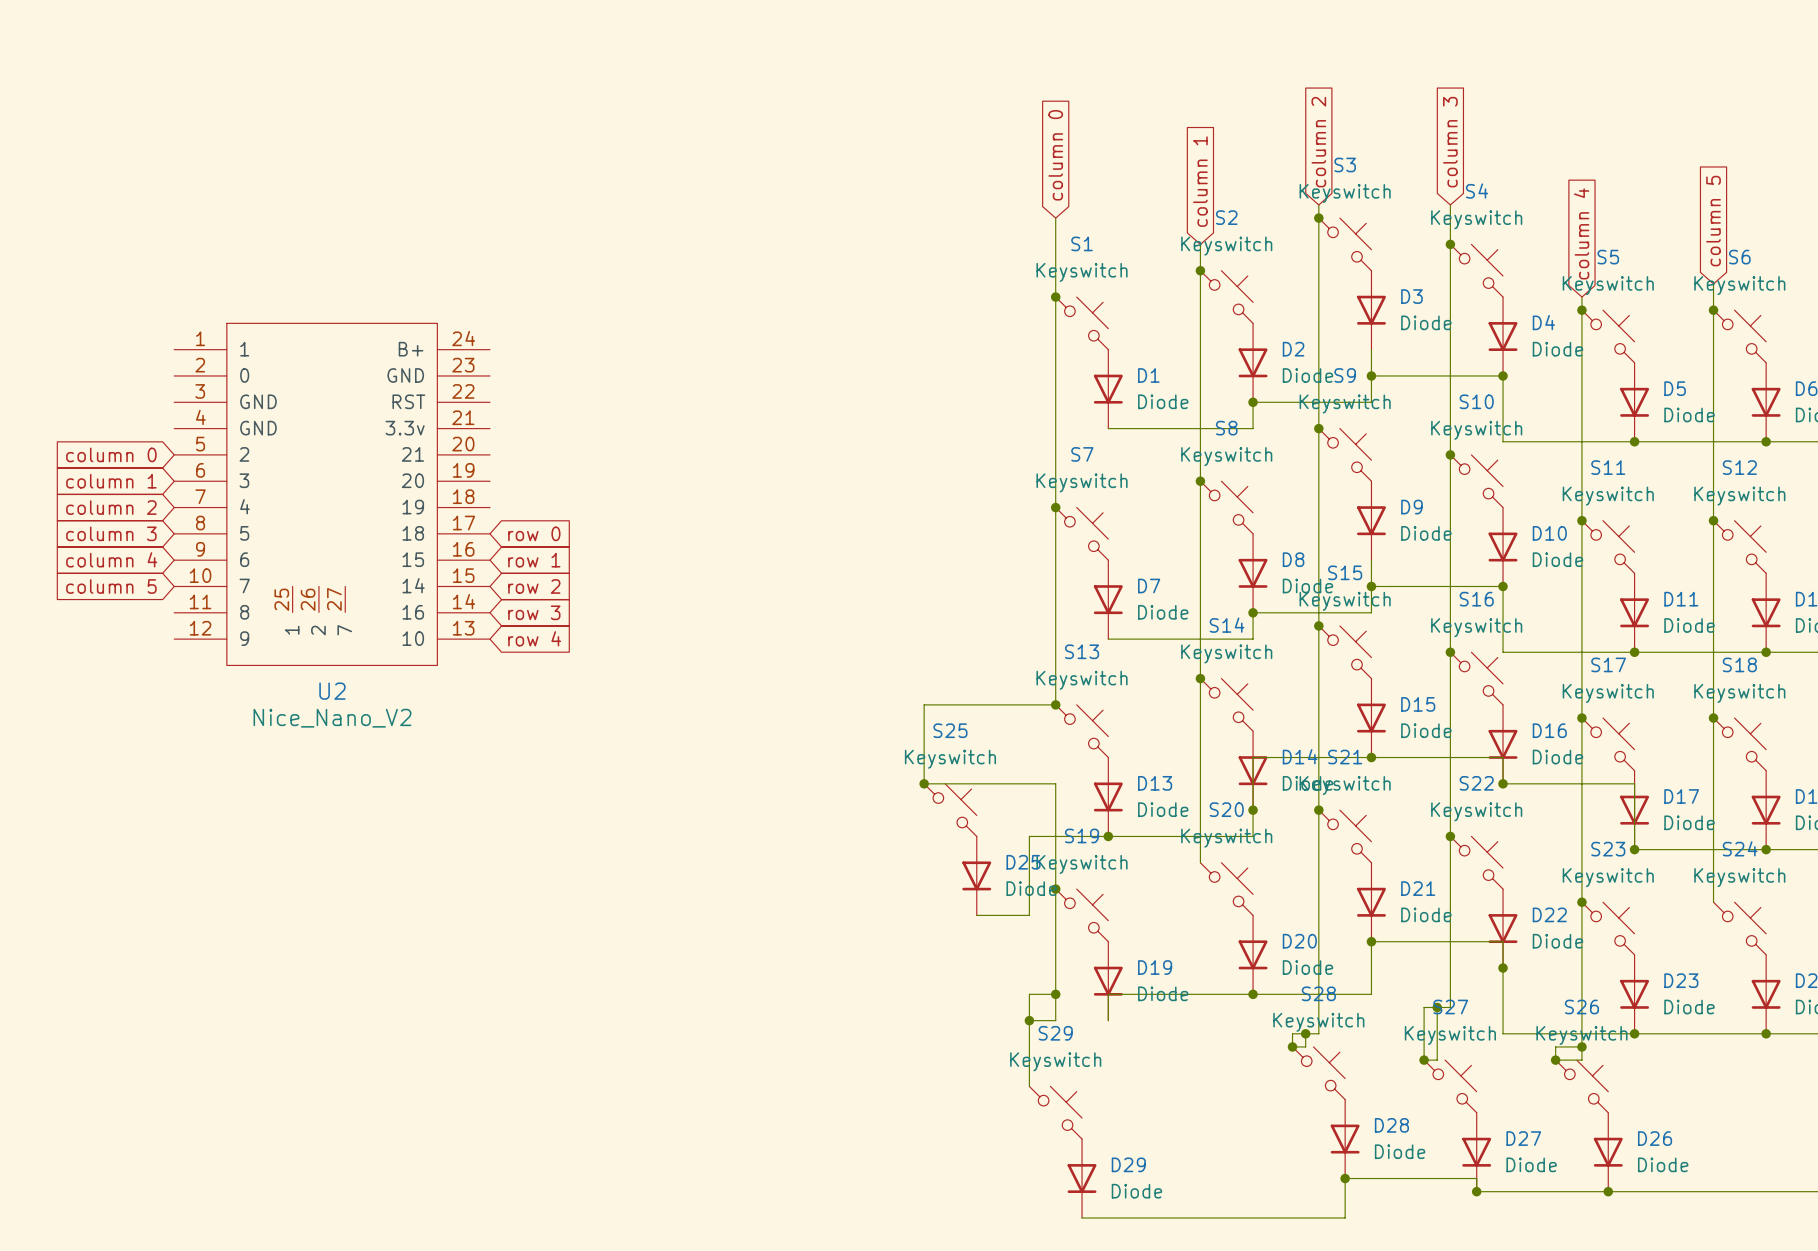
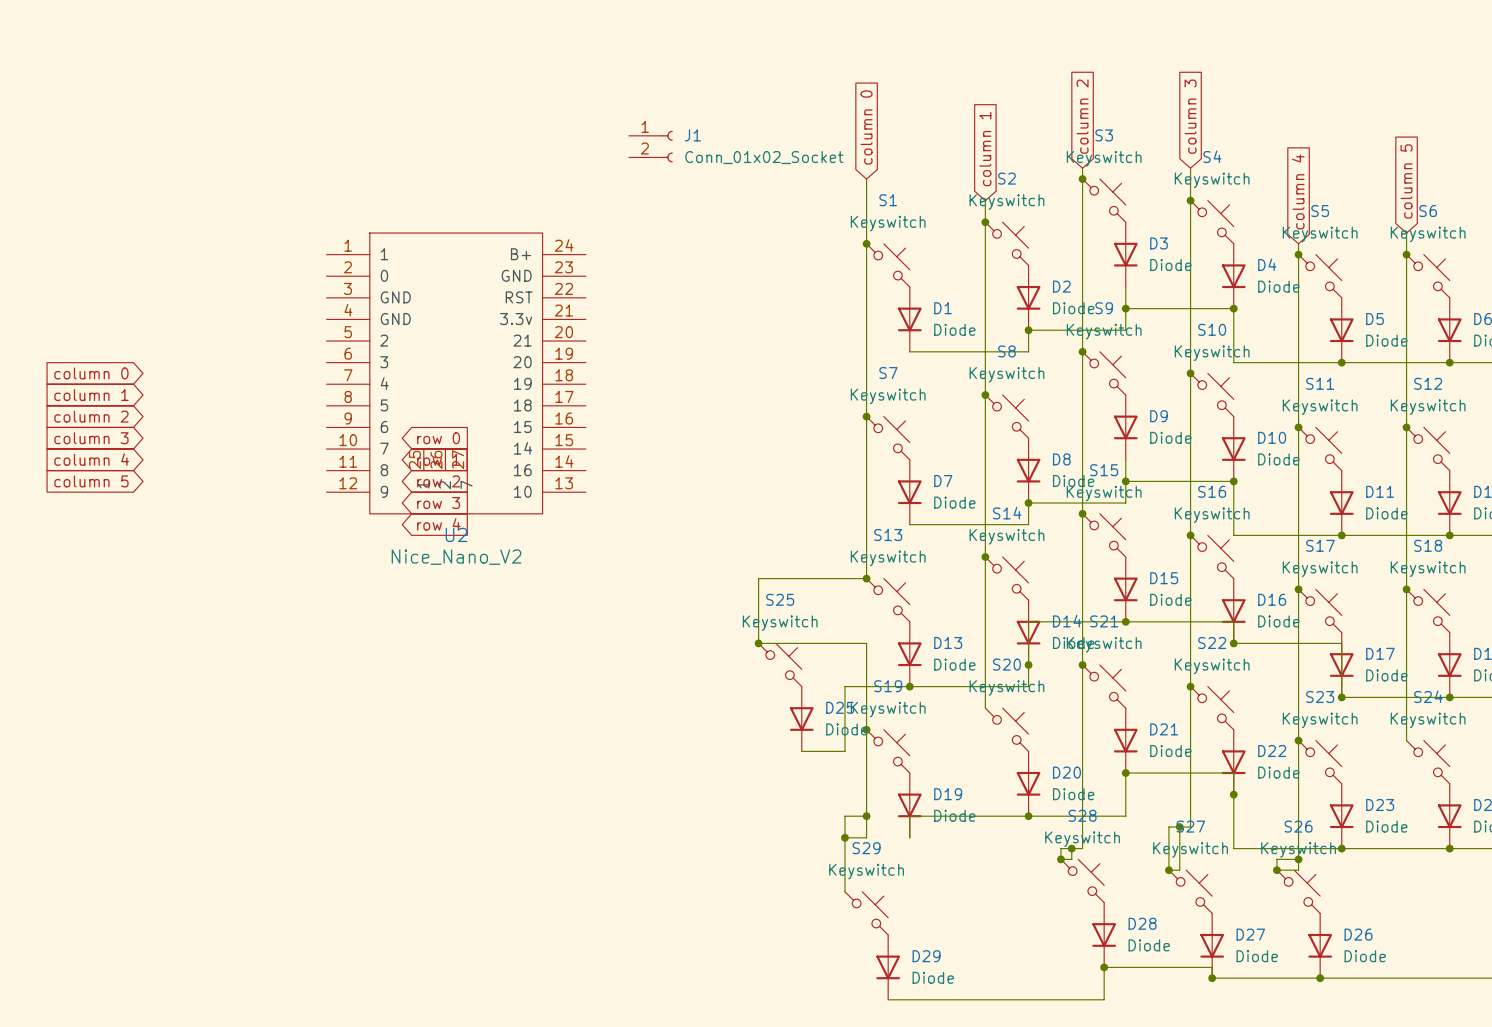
J1: none -> Conn_01x02_Socket (650, 146)
U2 position: (332, 494) -> (456, 373)

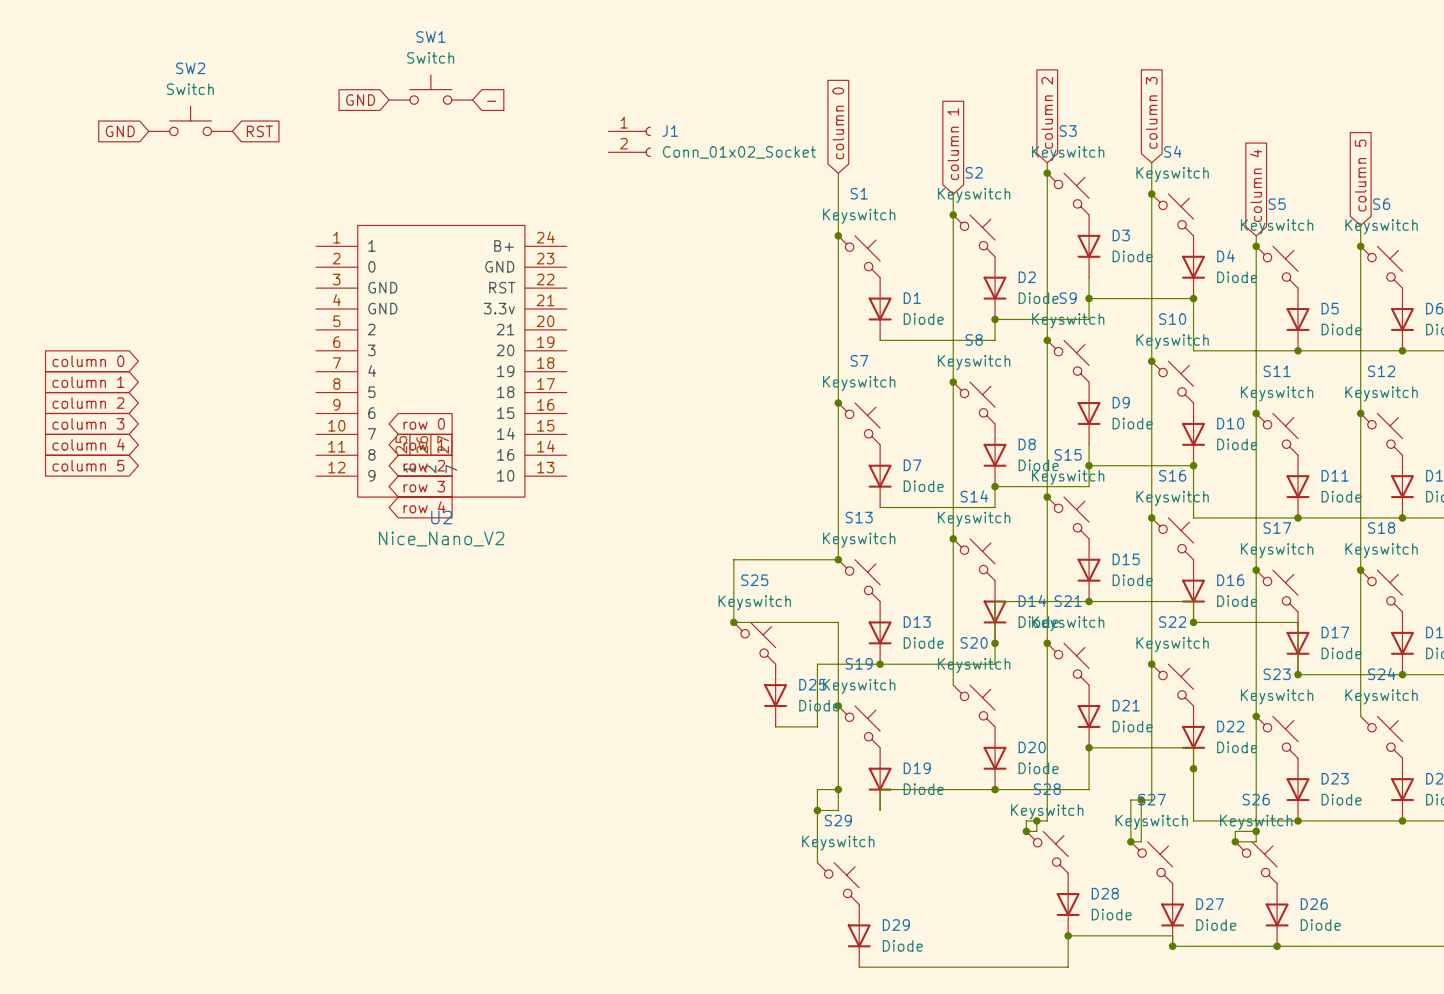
SW1: none -> Switch (430, 89)
global label: none -> GND (360, 100)
global label: none -> - (491, 101)
SW2: none -> Switch (190, 120)
global label: none -> GND (120, 131)
global label: none -> RST (259, 131)

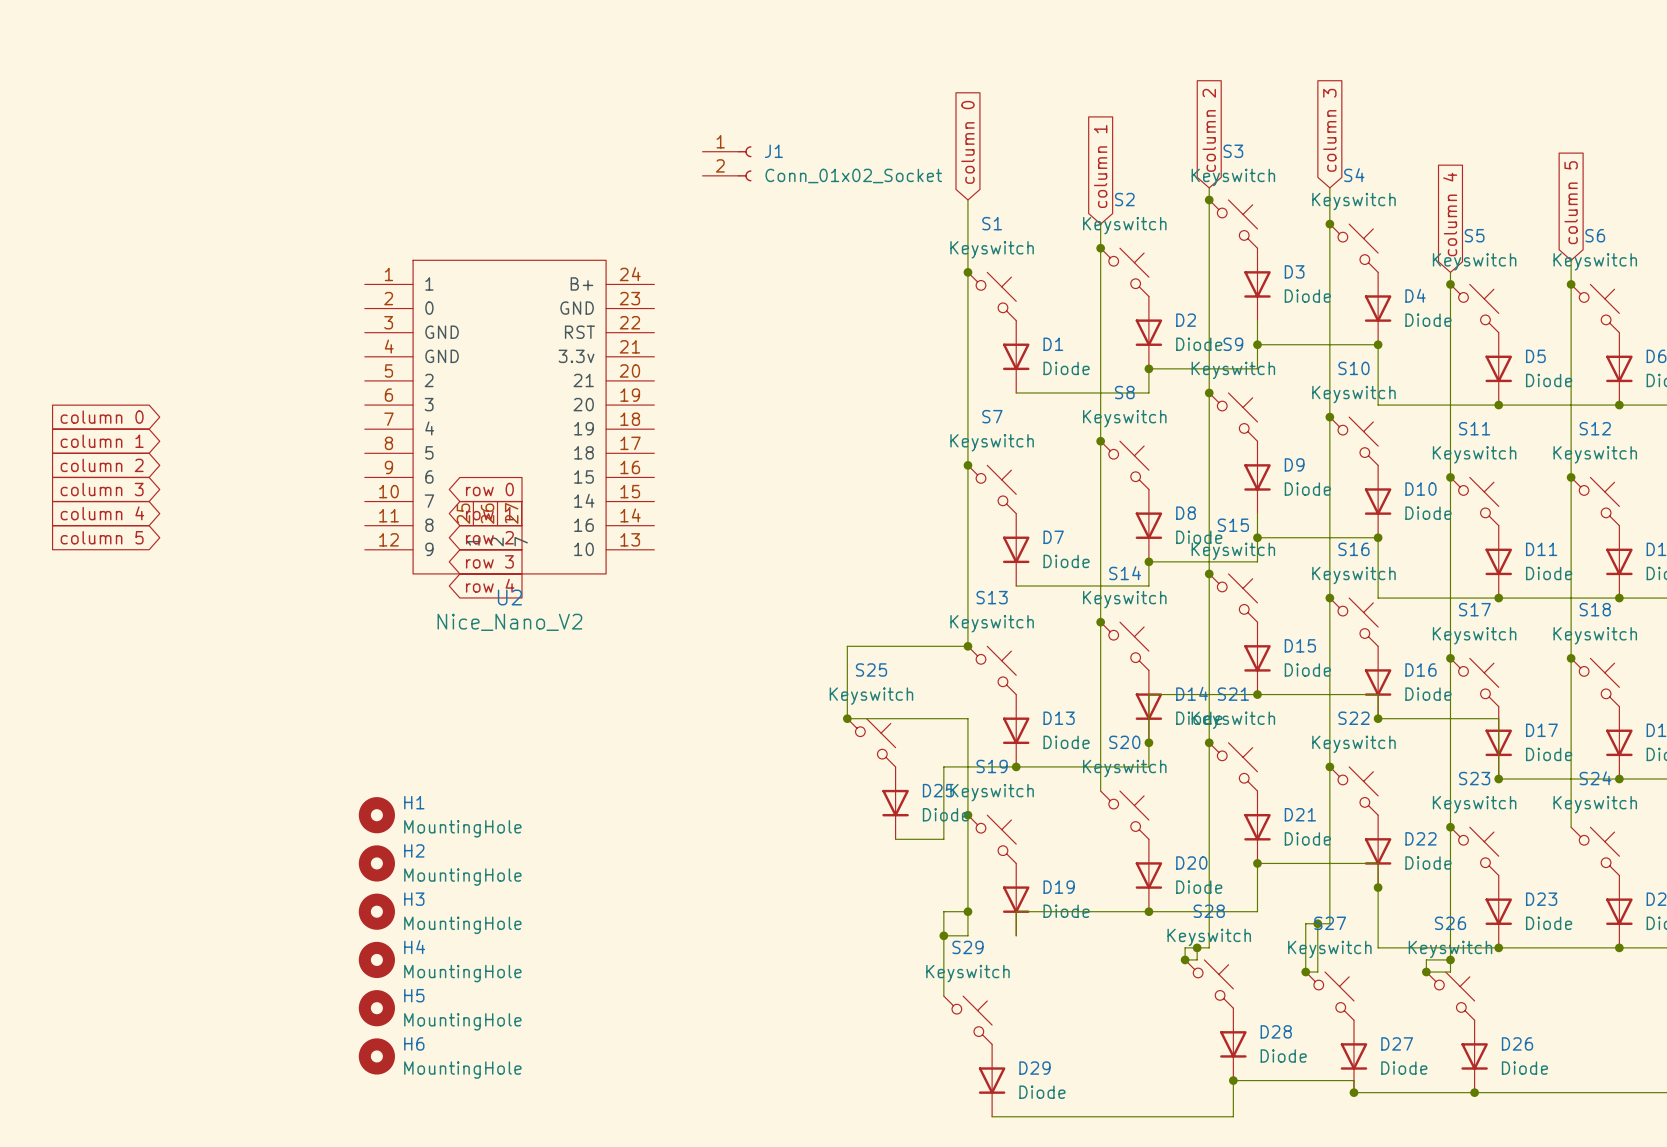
SW1: Switch (430, 89) -> none
global label: GND (360, 100) -> none
global label: - (491, 101) -> none
SW2: Switch (190, 120) -> none
global label: GND (120, 131) -> none
global label: RST (259, 131) -> none
H1: none -> MountingHole (376, 815)
H2: none -> MountingHole (376, 863)
H3: none -> MountingHole (376, 911)
H4: none -> MountingHole (376, 959)
H5: none -> MountingHole (376, 1008)
H6: none -> MountingHole (376, 1056)

